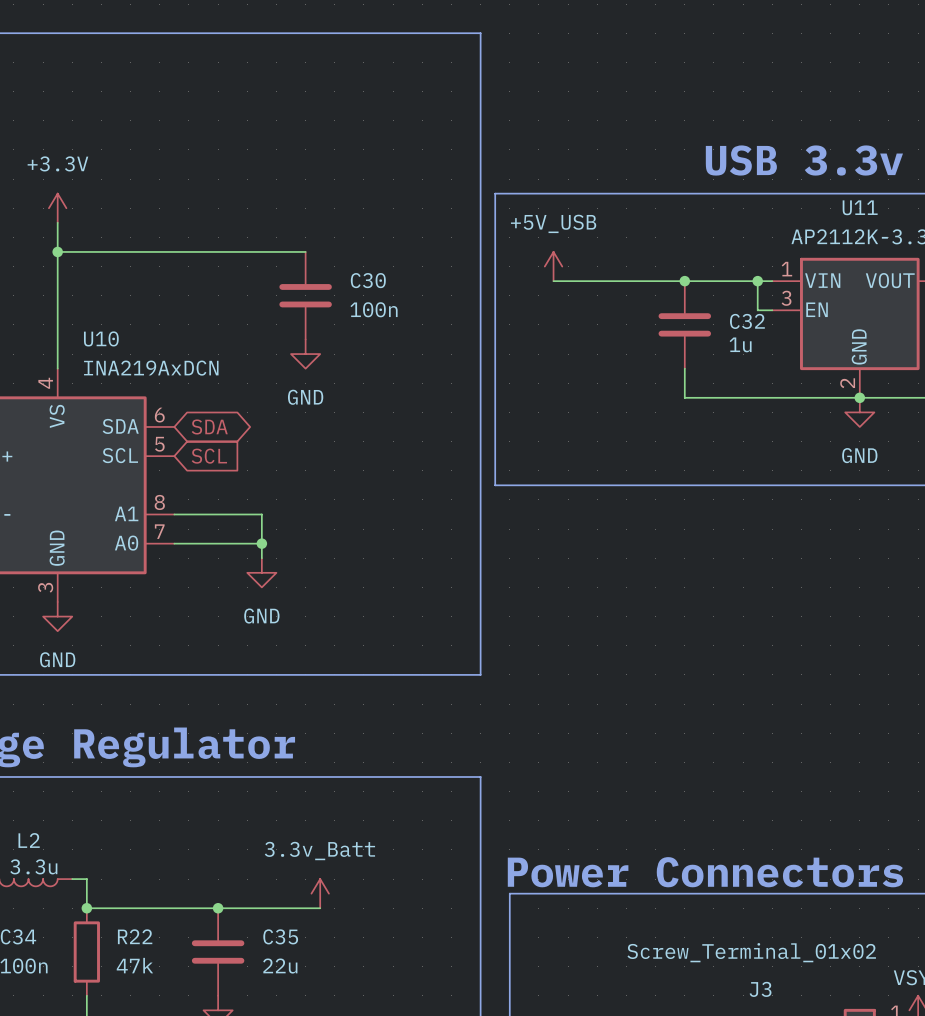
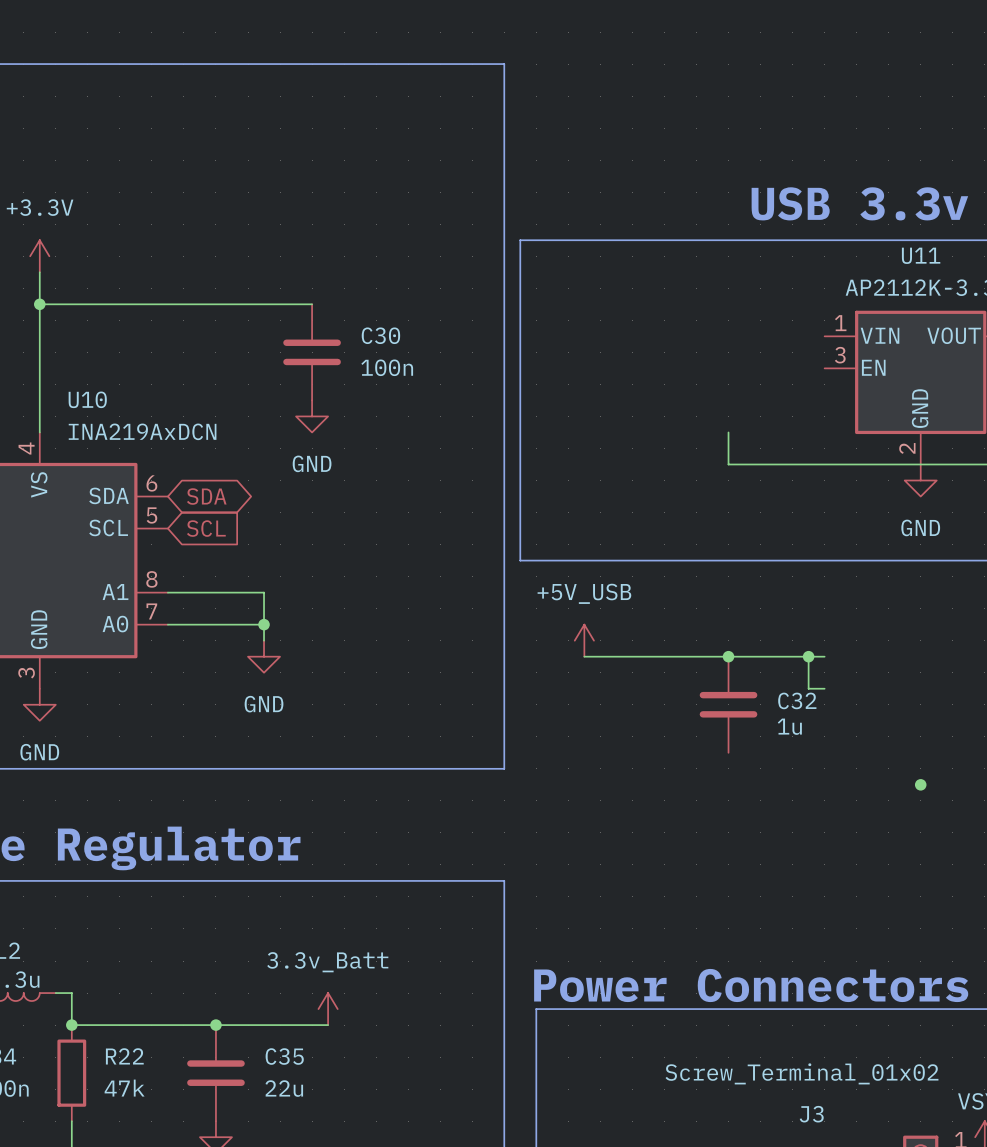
power symbol: +5V_USB (553, 266) -> none
wire: (553, 281) (772, 281) -> none
junction: (684, 281) -> none
wire: (757, 281) (757, 310) (772, 310) -> none
junction: (757, 281) -> none
C32 position: (684, 324) -> (728, 704)
junction: (859, 397) -> none
power symbol: none -> +5V_USB (584, 640)
wire: none -> (584, 656) (824, 656)
junction: none -> (728, 656)
wire: none -> (808, 656) (808, 688) (824, 688)
junction: none -> (808, 656)
junction: none -> (920, 784)

